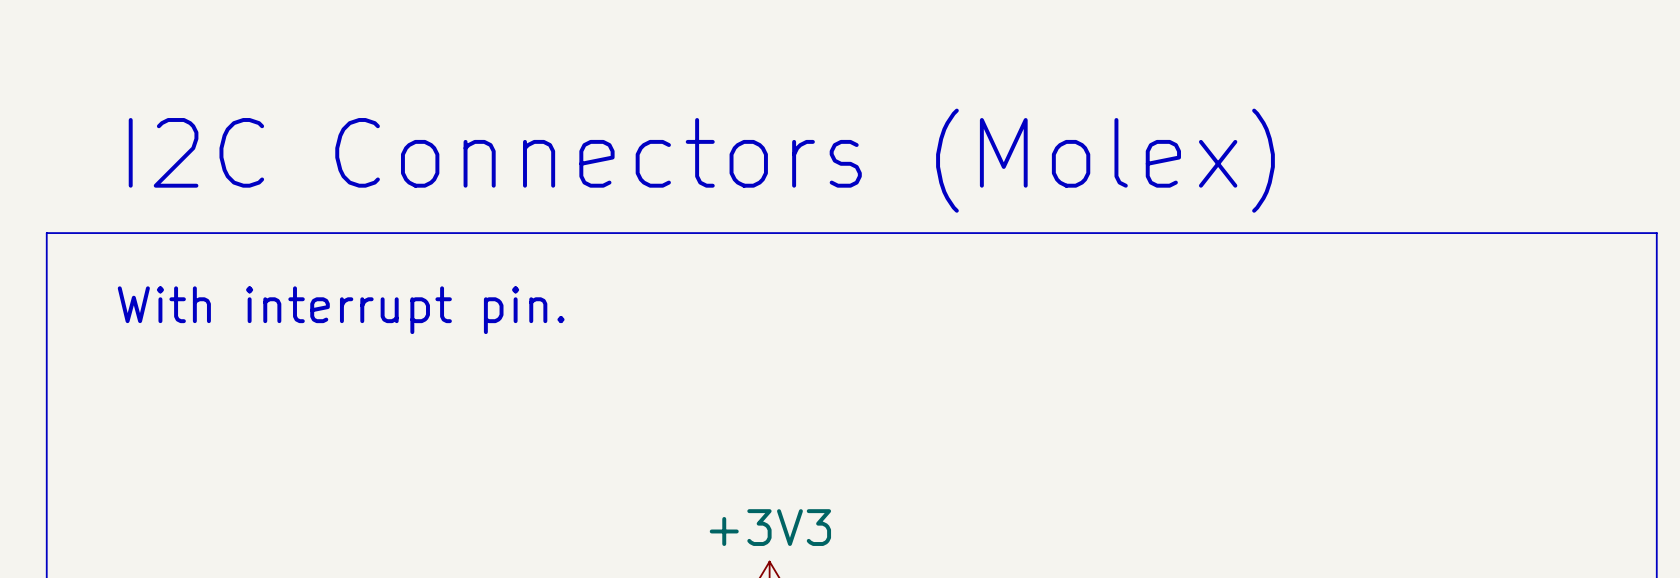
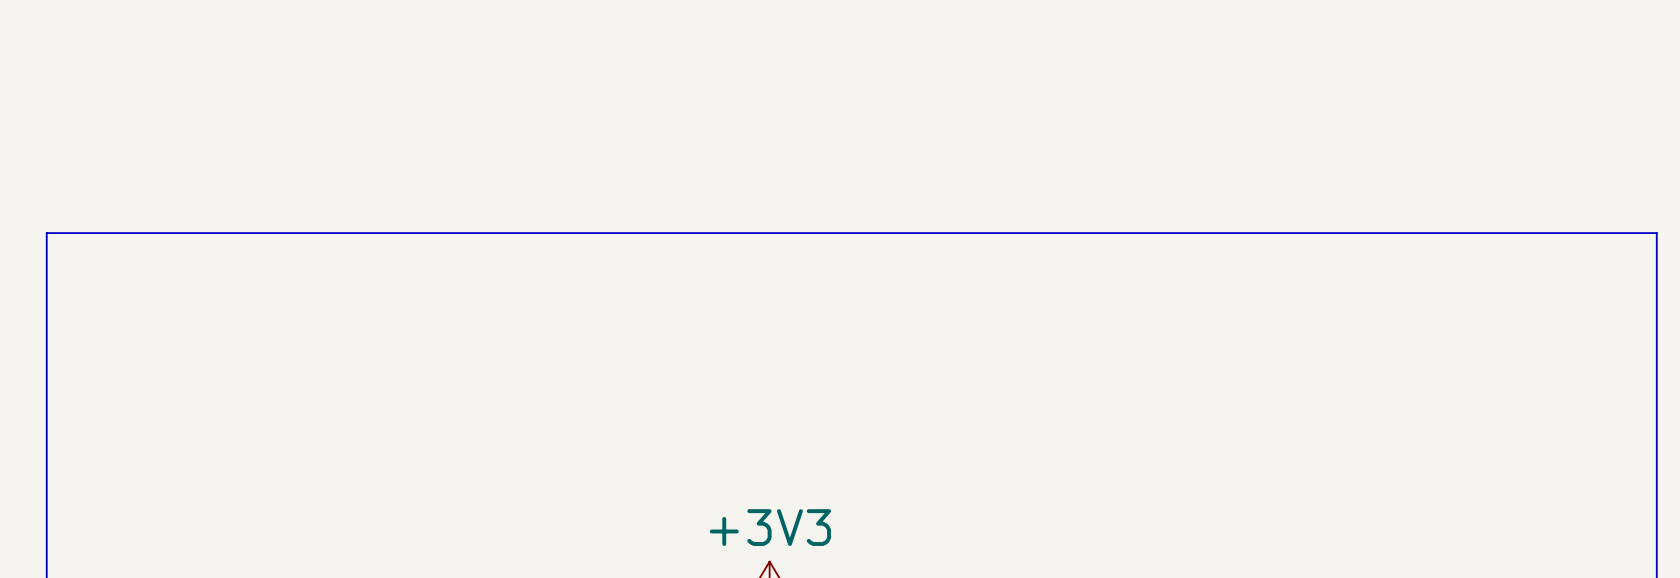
text: I2C Connectors (Molex) (701, 160) -> none
text: With interrupt pin. (341, 310) -> none

